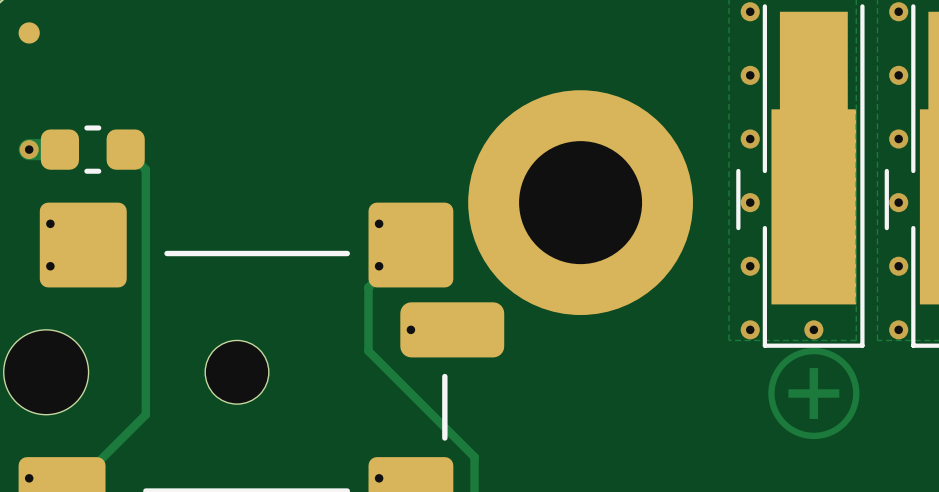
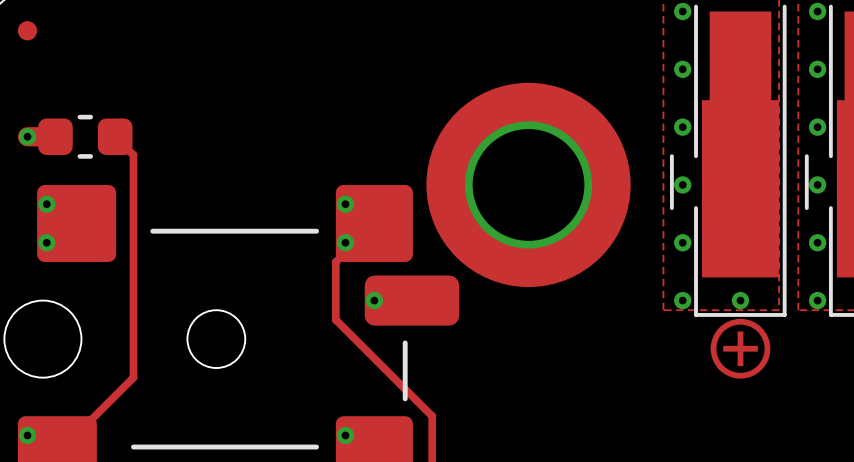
drawing shape: [768, 347, 860, 440] -> [710, 318, 771, 379]

